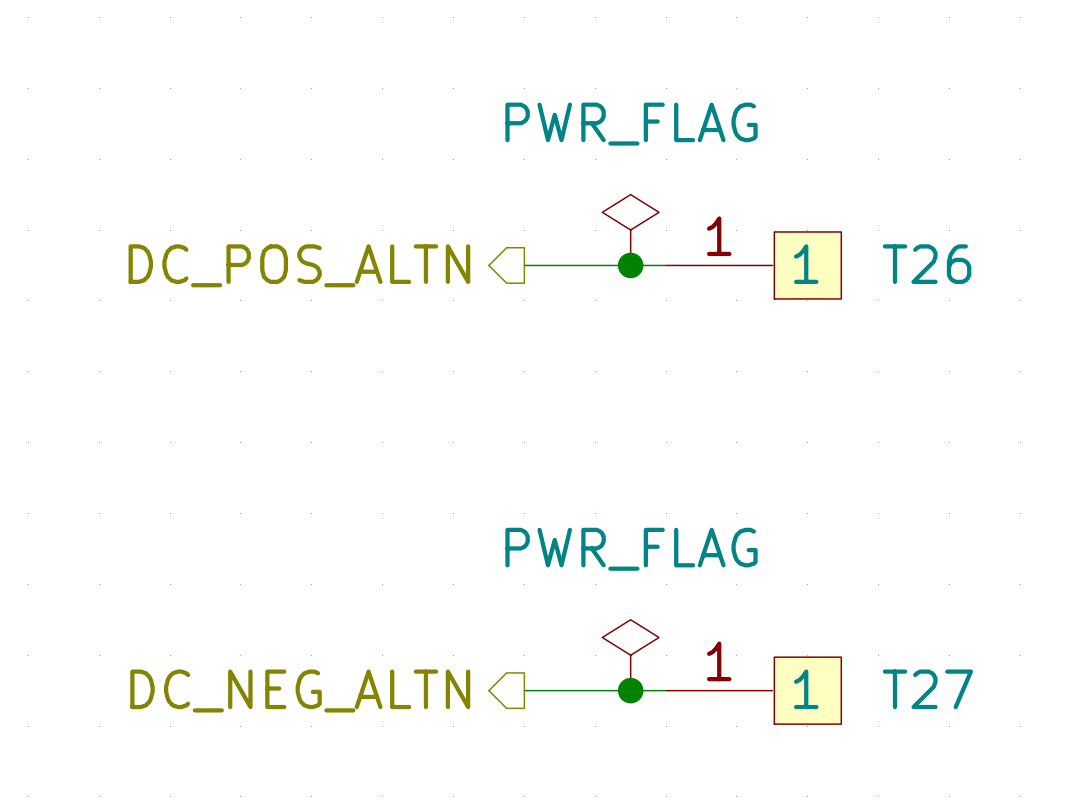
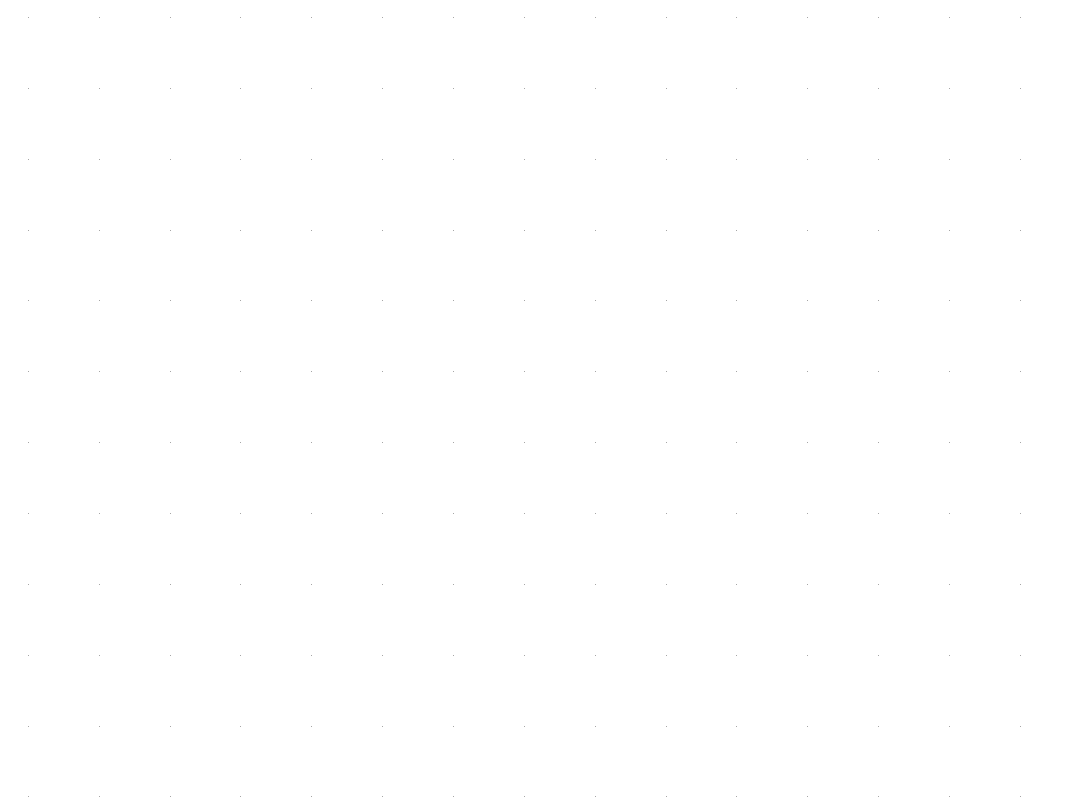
power symbol: PWR_FLAG (630, 230) -> none
hierarchical label: DC_POS_ALTN (299, 265) -> none
wire: (524, 265) (666, 265) -> none
junction: (630, 265) -> none
T26: (753, 265) -> none
power symbol: PWR_FLAG (630, 655) -> none
wire: (524, 690) (666, 690) -> none
junction: (630, 690) -> none
T27: (753, 690) -> none
hierarchical label: DC_NEG_ALTN (300, 691) -> none

